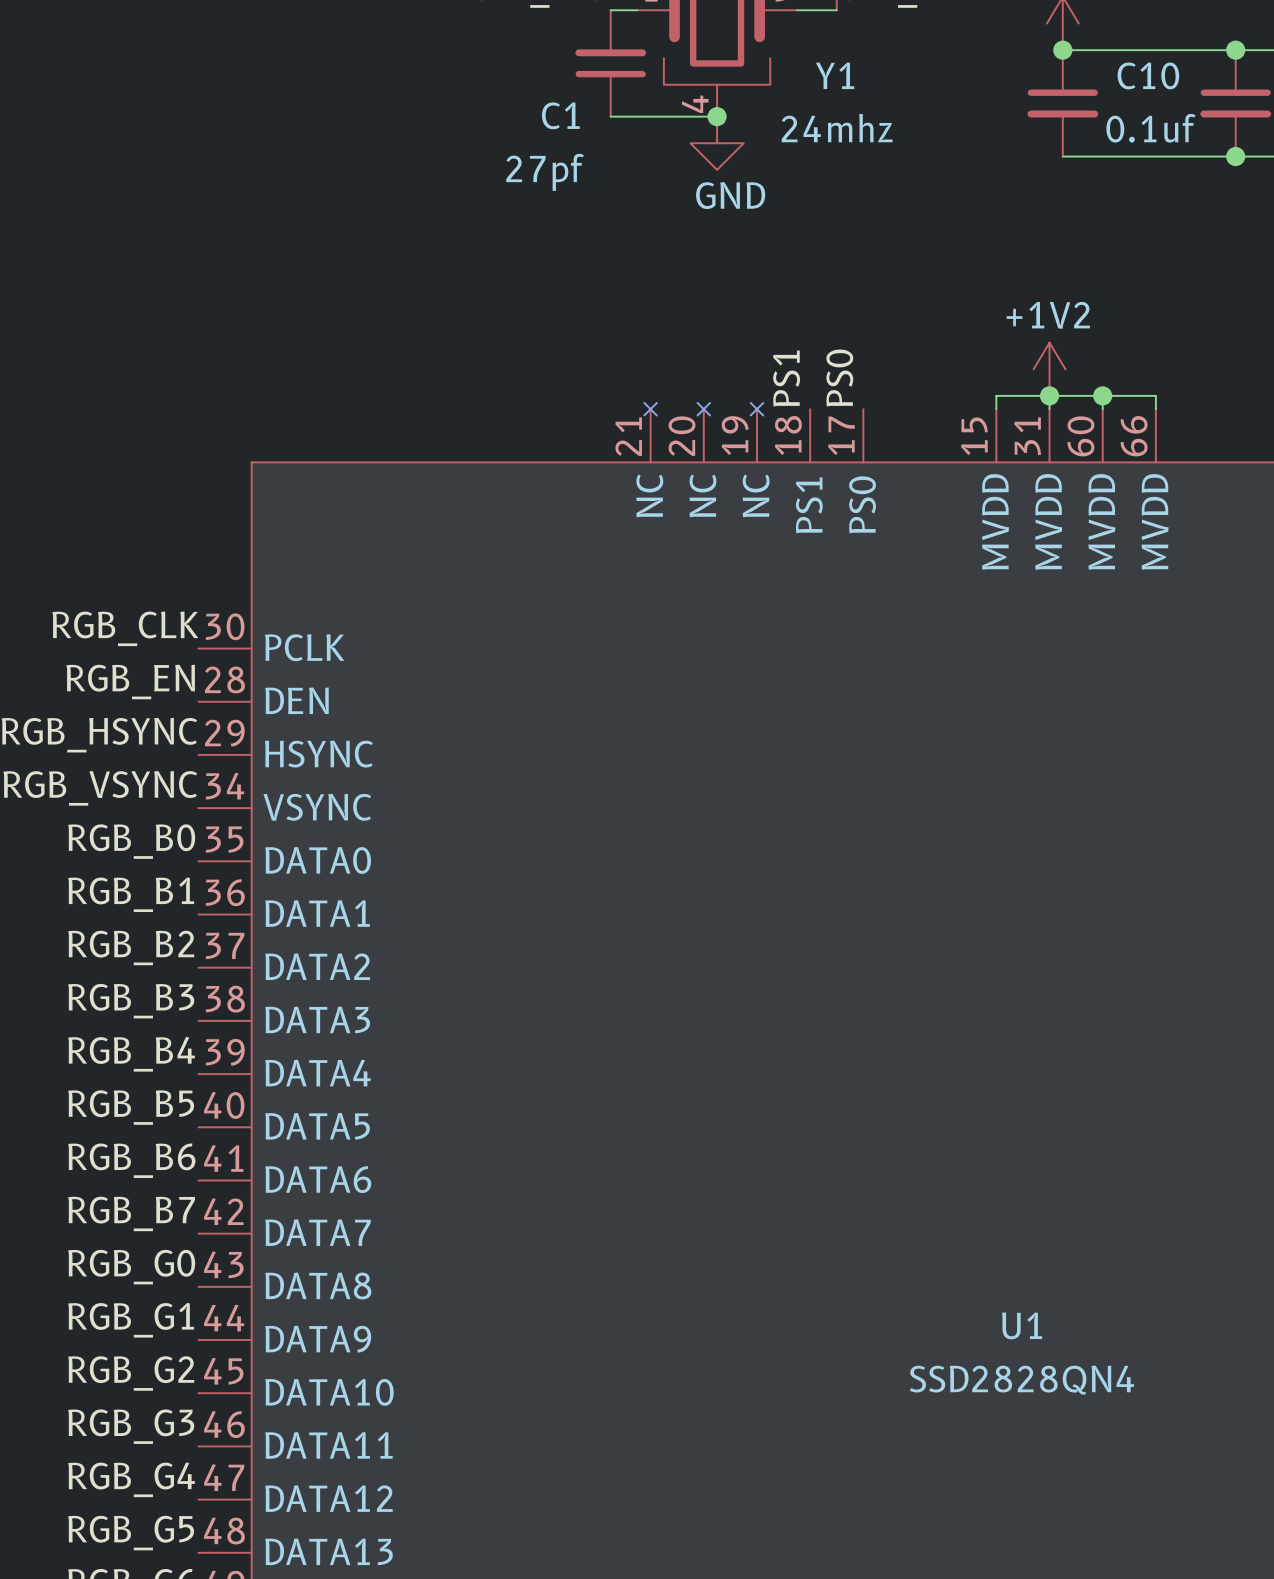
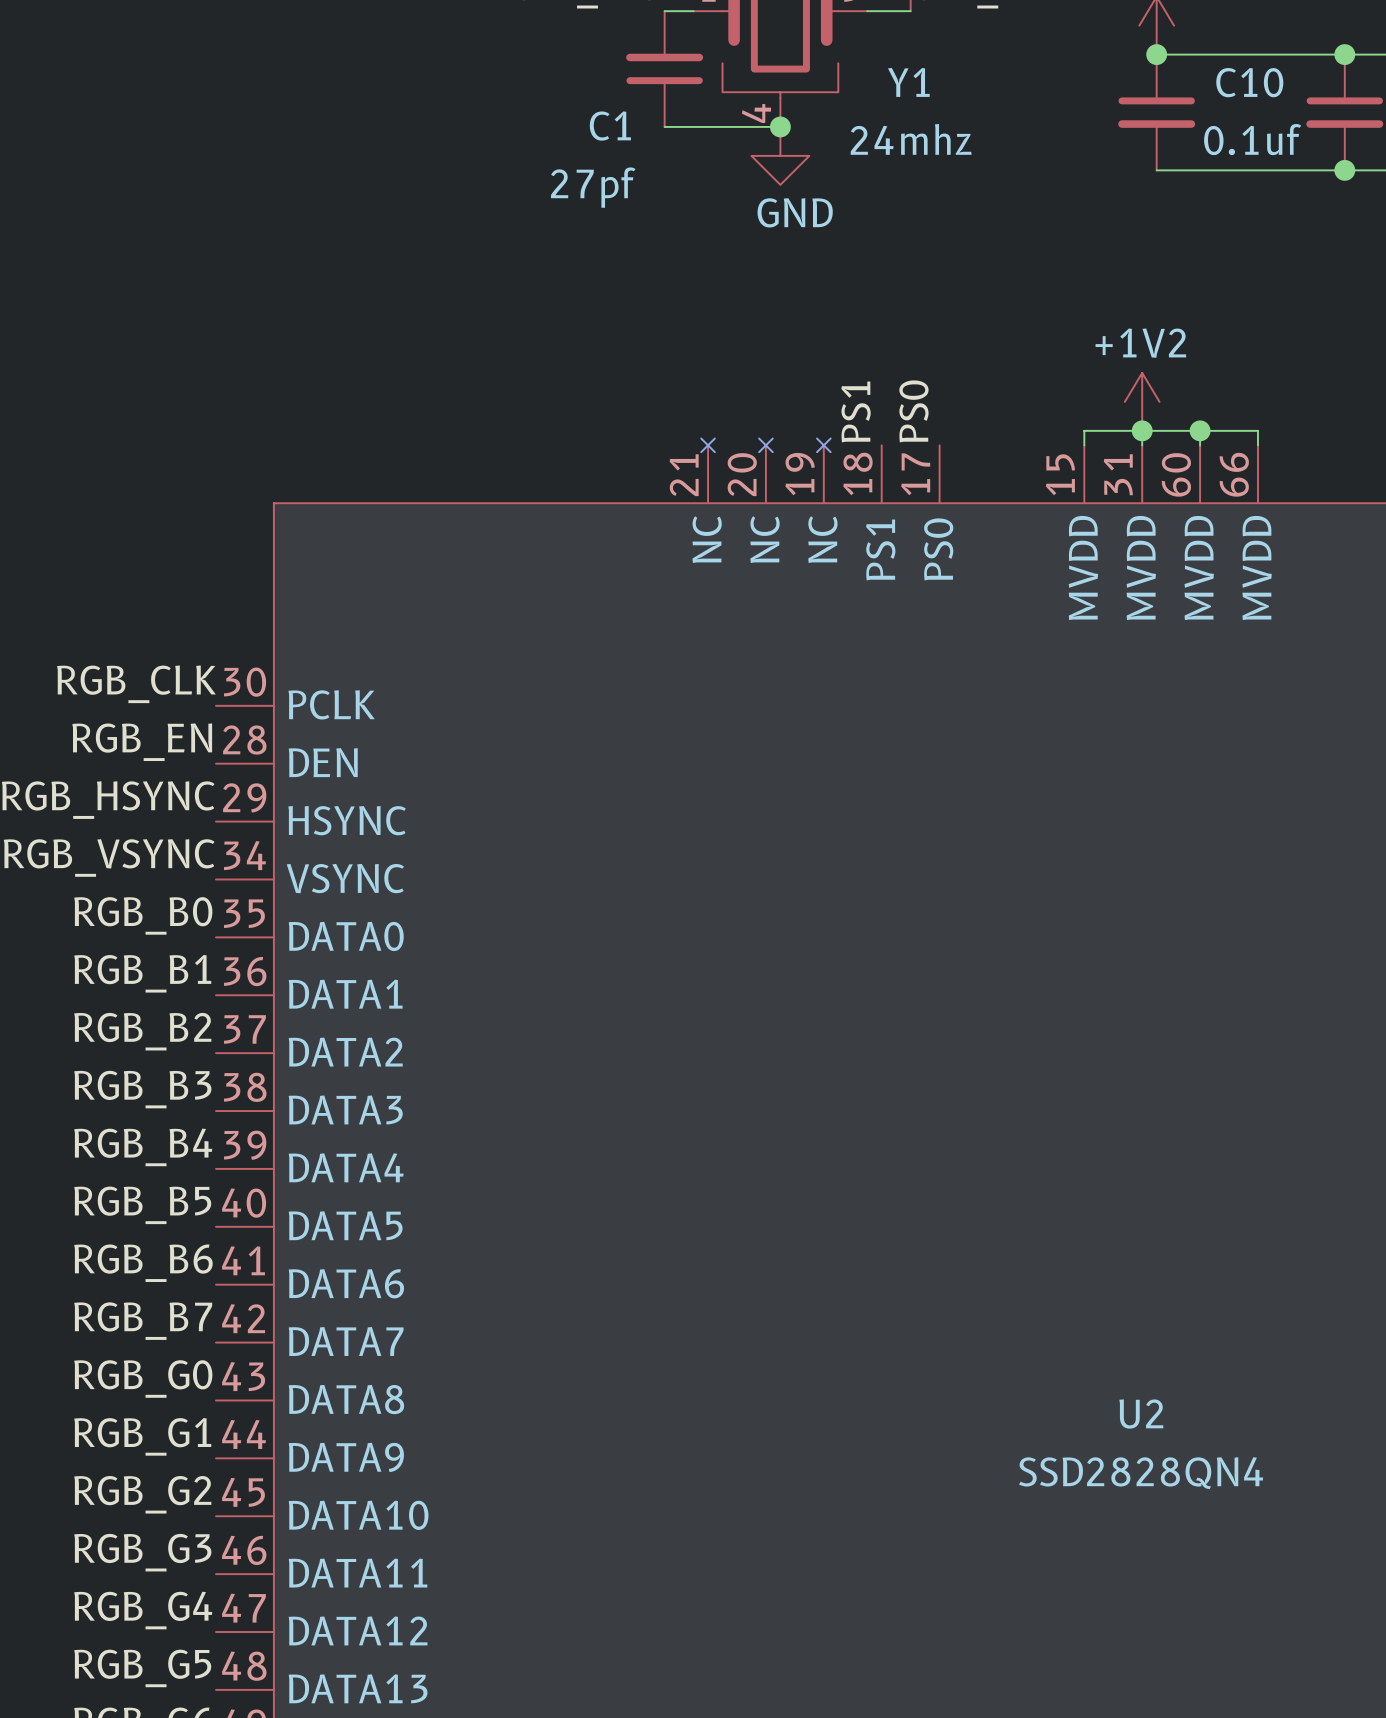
U1 name: U1 (1022, 1325) -> U2 (1141, 1414)
U1 value position: SSD2828QN4 (1021, 1380) -> SSD2828QN4 (1141, 1473)

